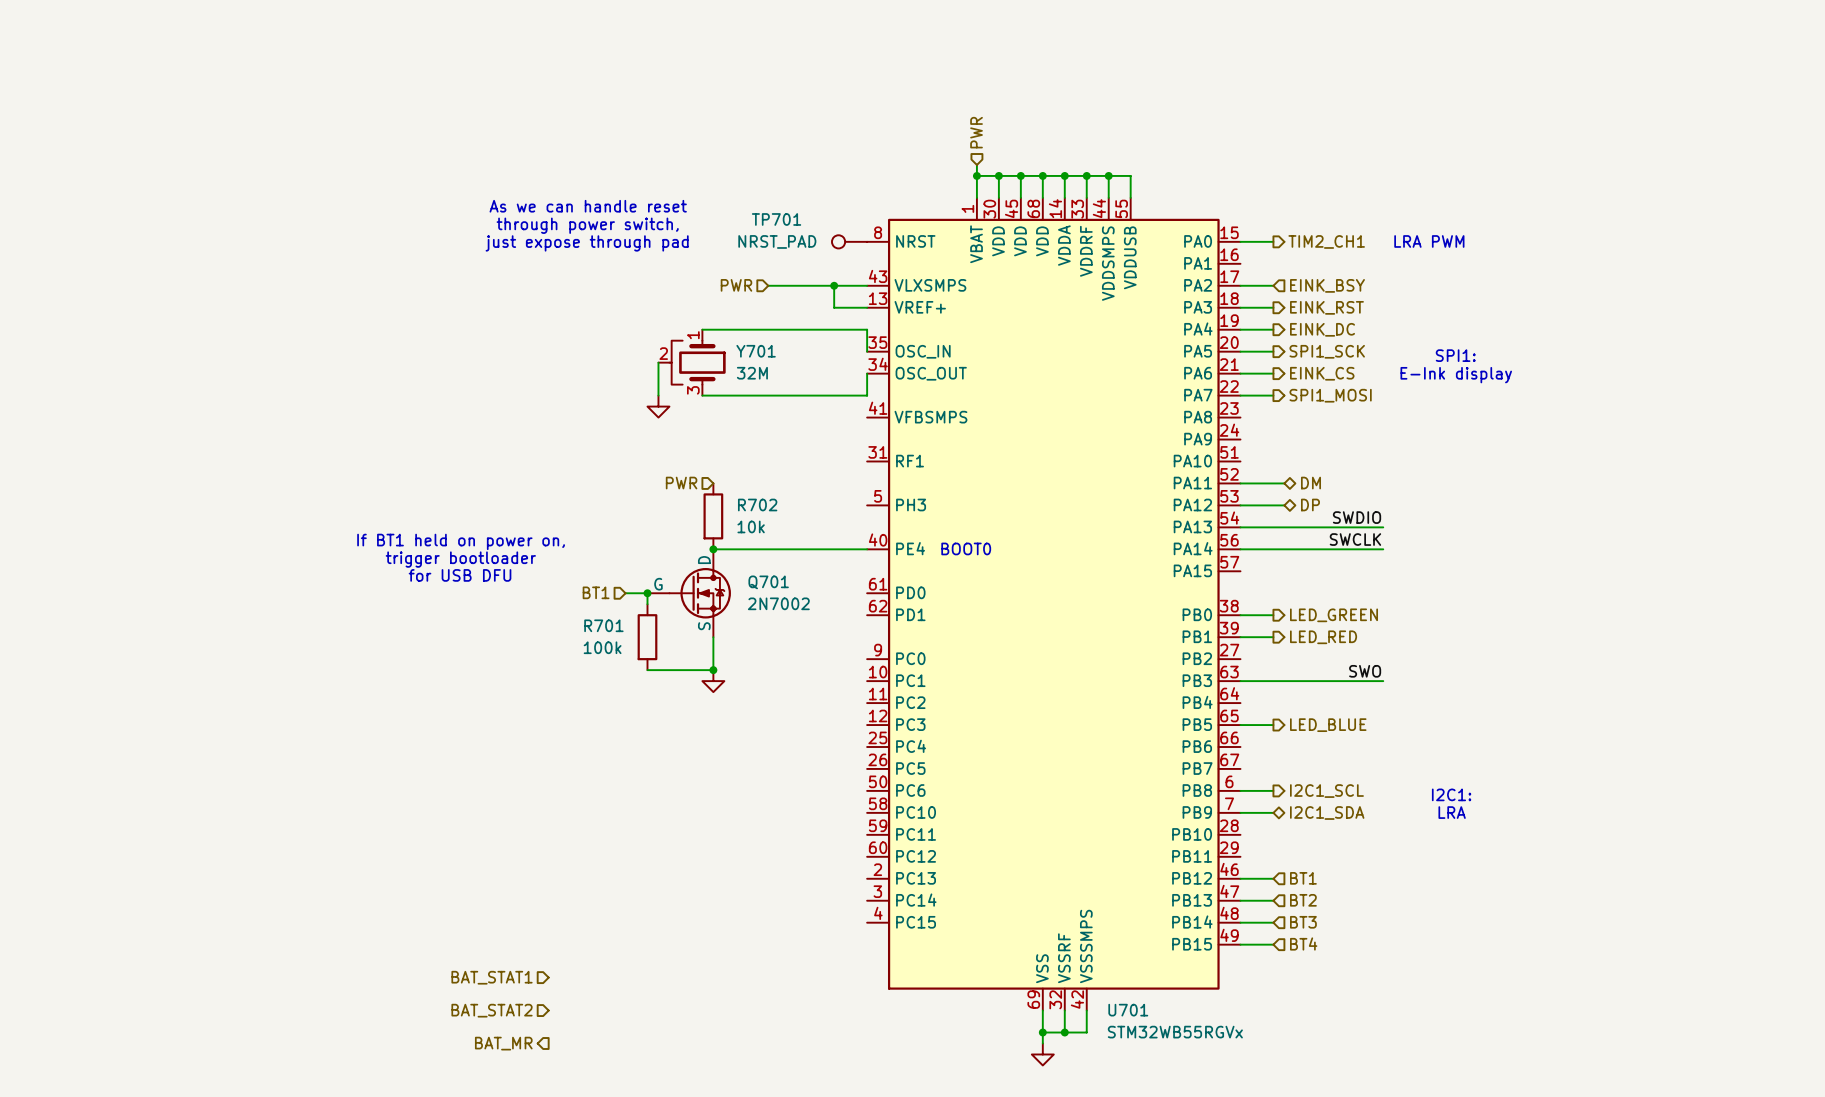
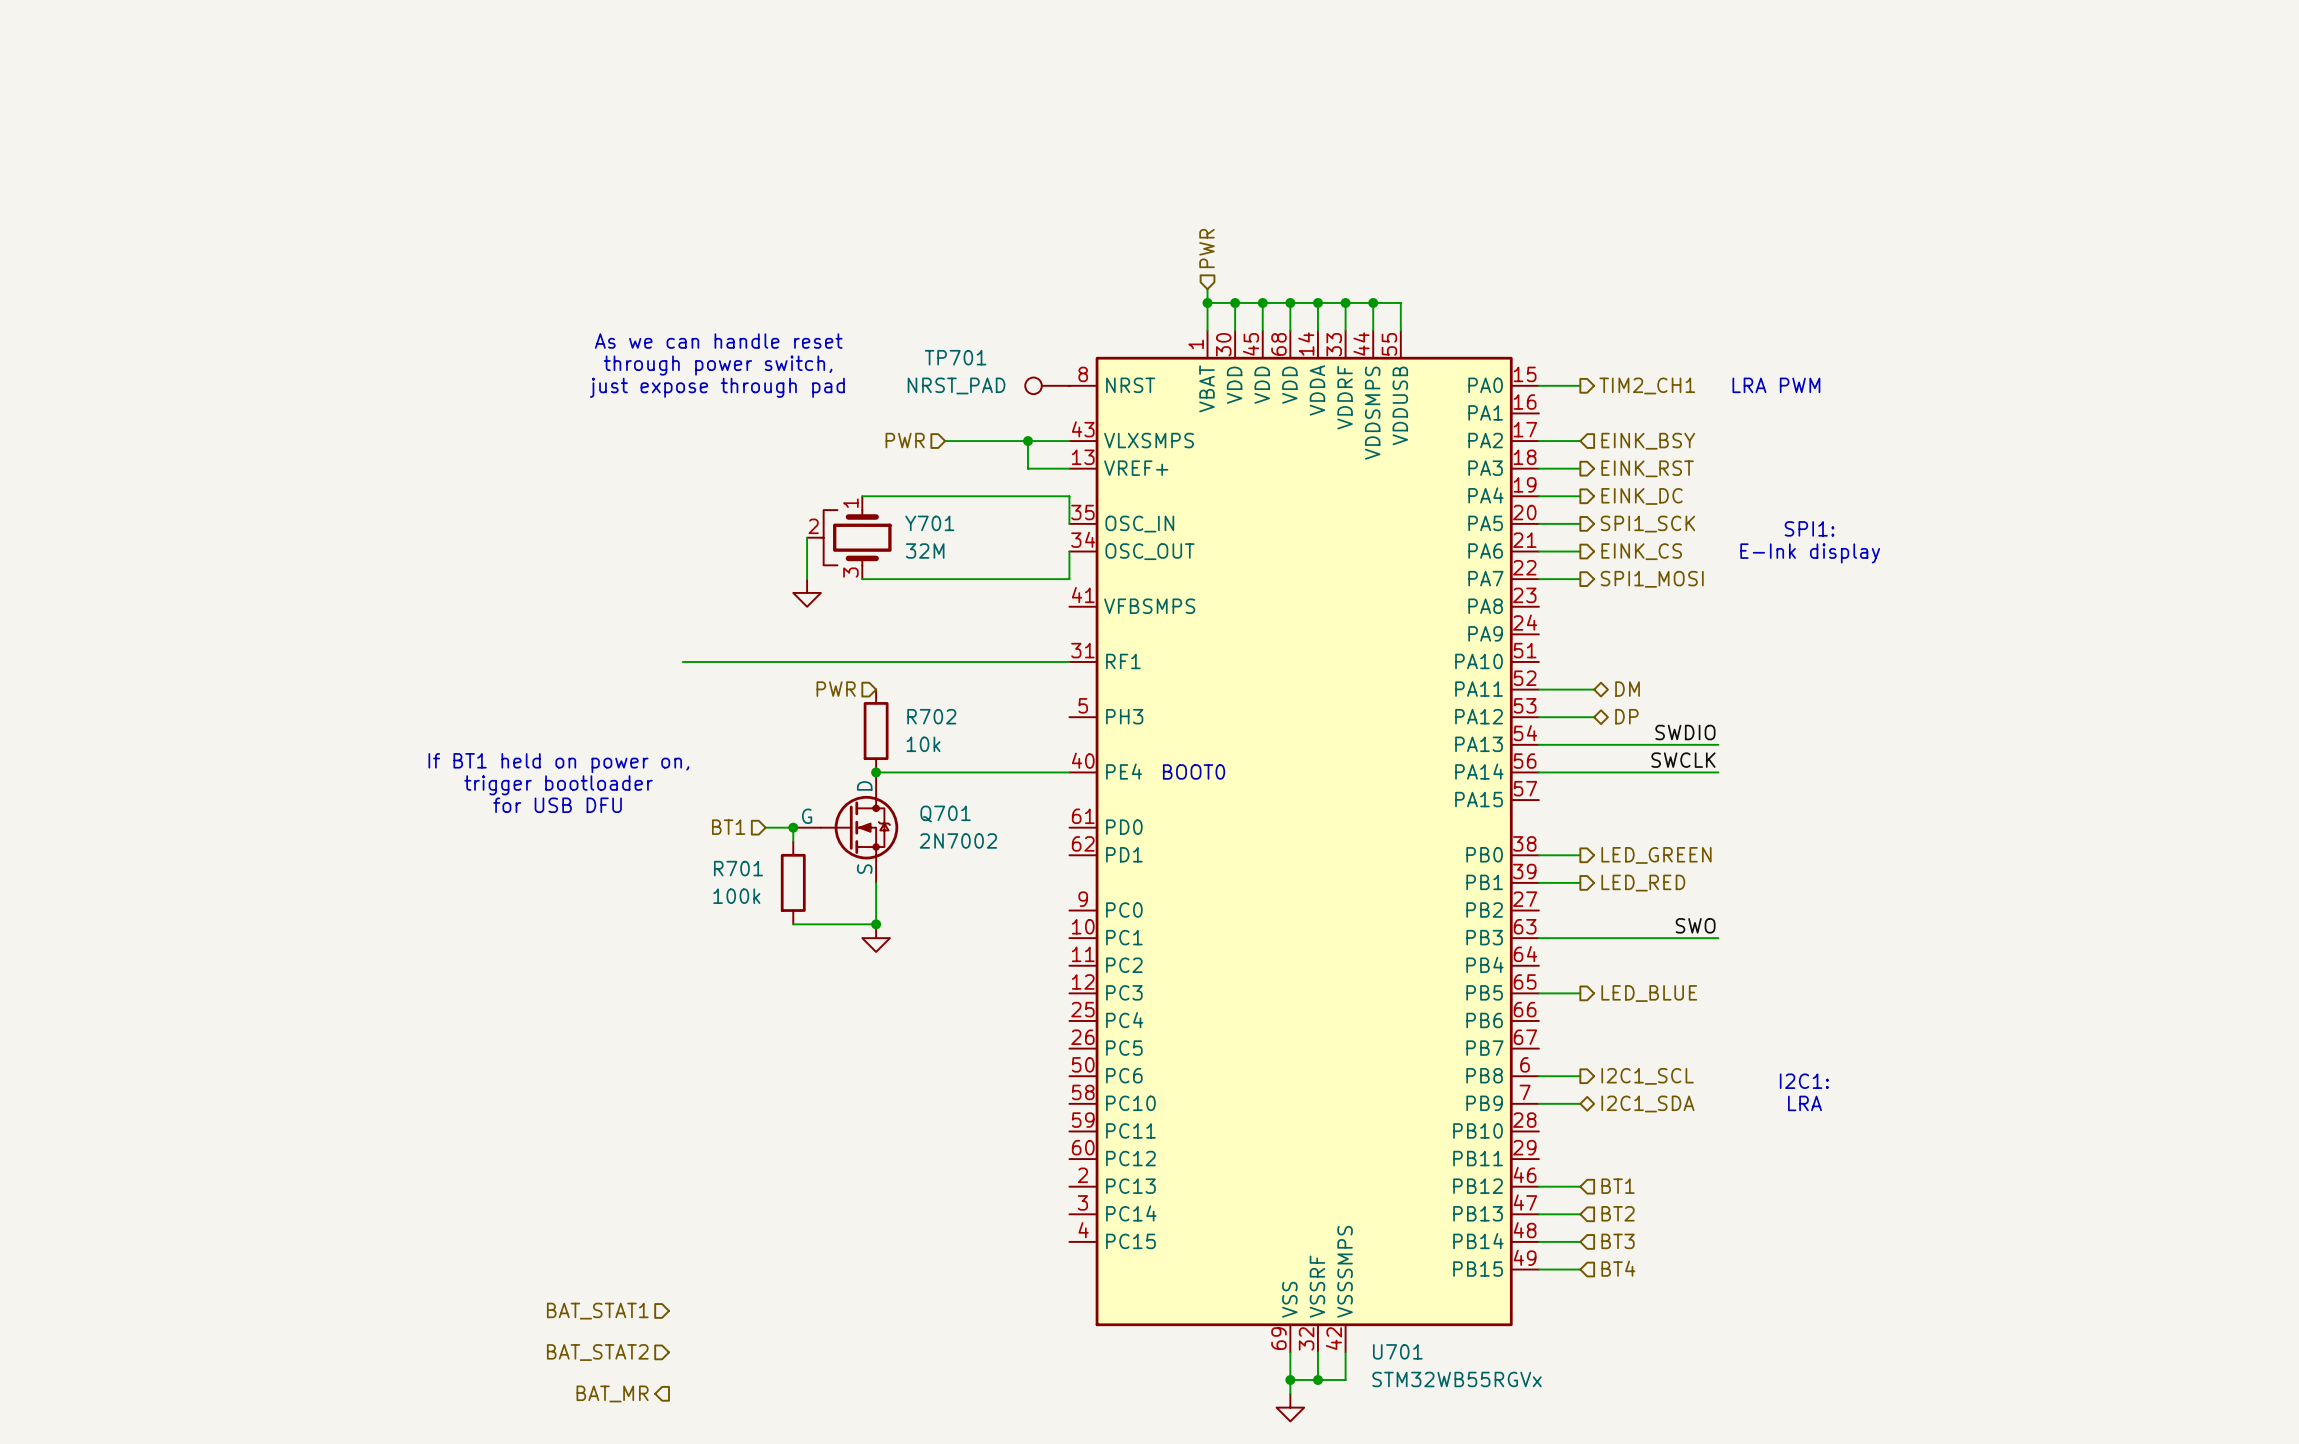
wire: none -> (682, 661) (1069, 661)

